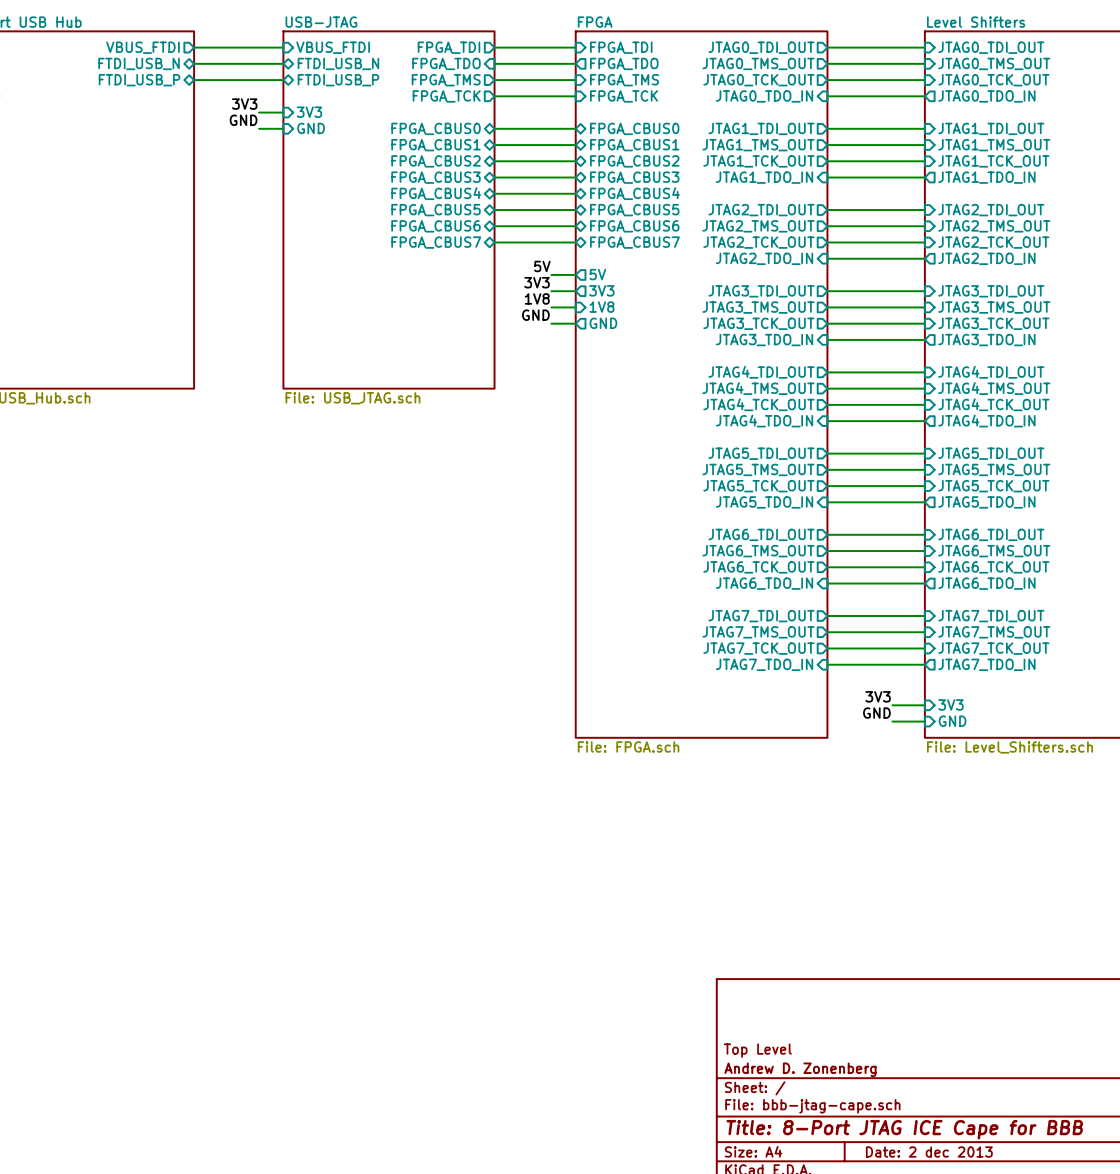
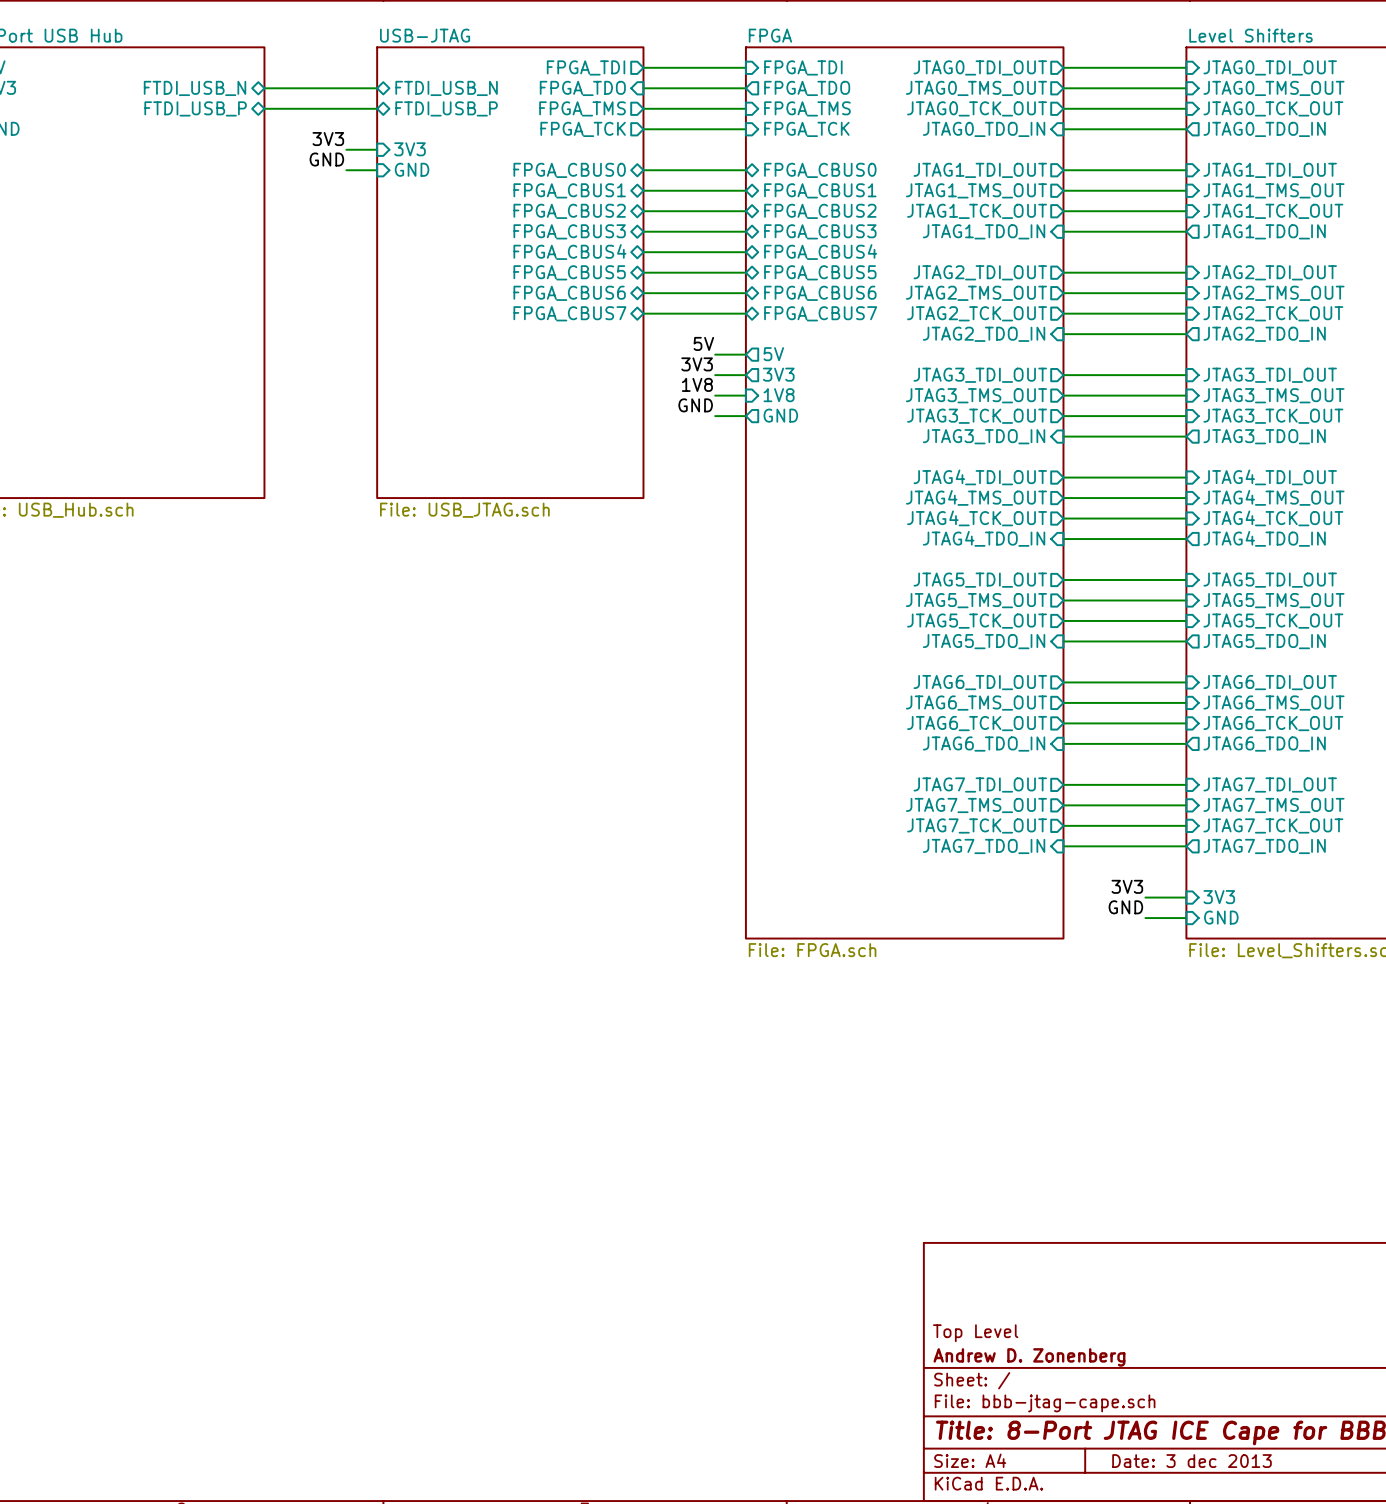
sheet pin: VBUS_FTDI (142, 47) -> none
wire: (194, 47) (283, 47) -> none
sheet pin: VBUS_FTDI (333, 47) -> none
title block: Date: 2 dec 2013 (929, 1152) -> Date: 3 dec 2013 (1192, 1461)

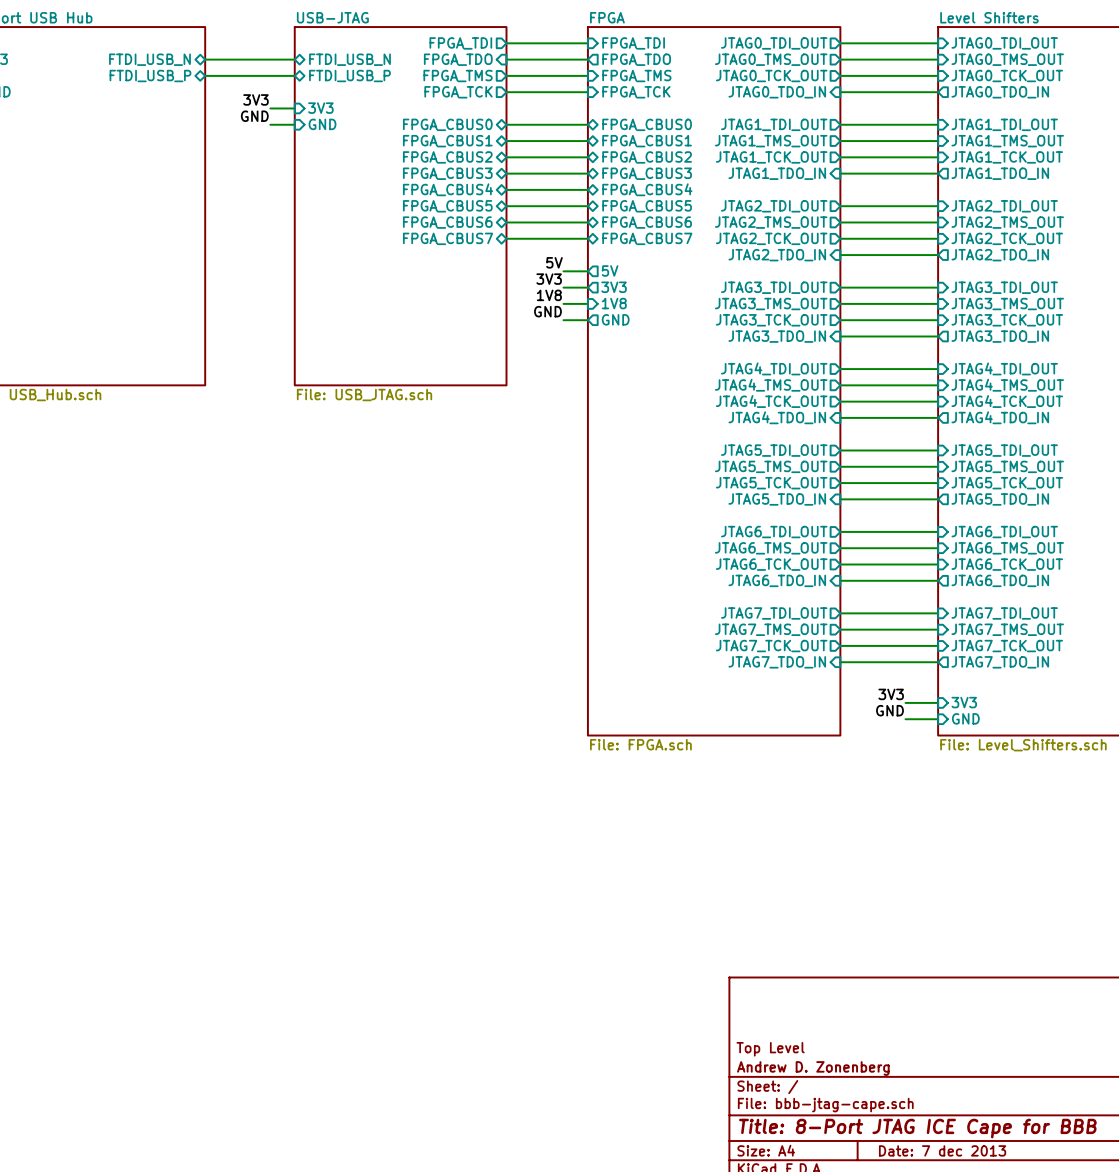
title block: Date: 3 dec 2013 (1192, 1461) -> Date: 7 dec 2013 (942, 1150)

